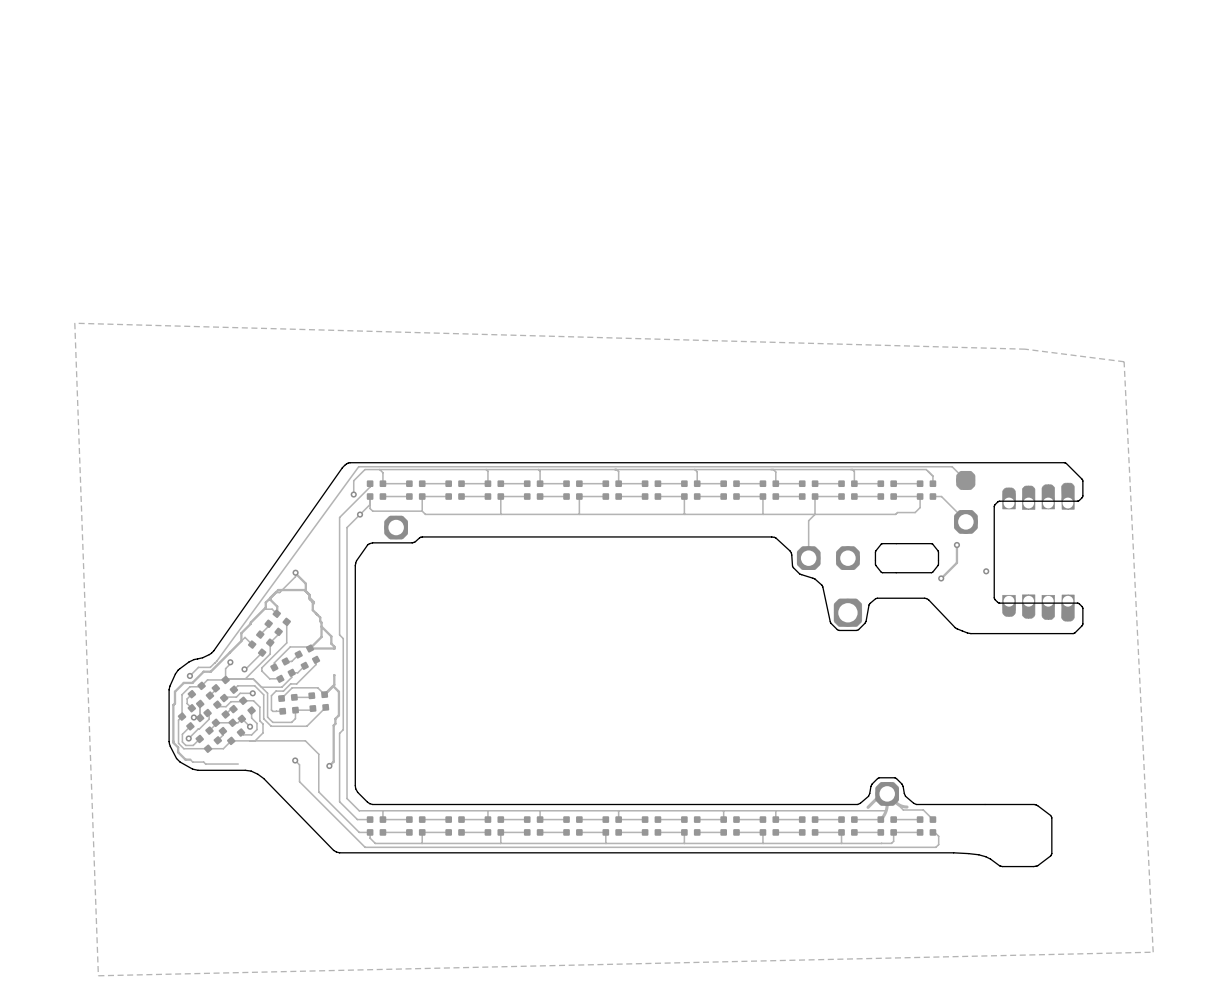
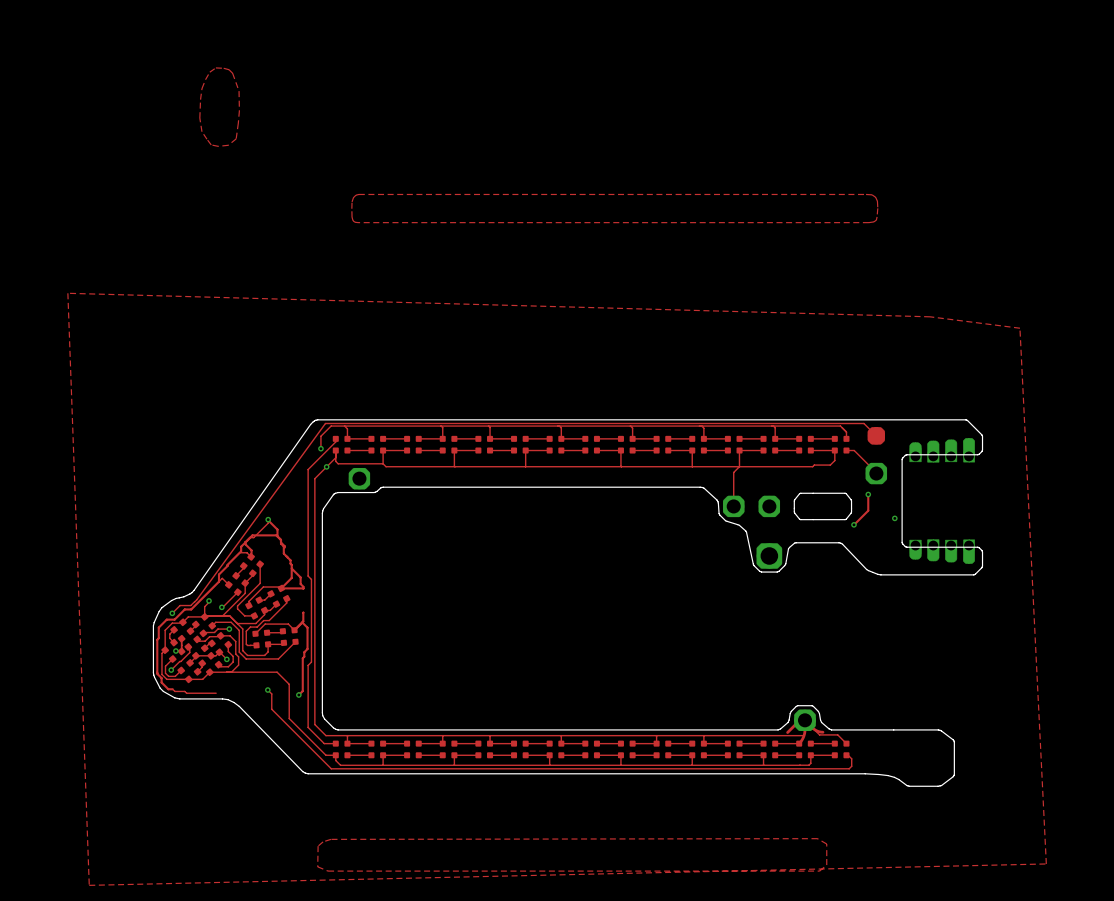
zone outline: none -> (215, 67) (209, 72) (201, 88) (199, 118) (201, 131) (211, 144) (218, 146) (228, 145) (236, 138) (239, 110) (239, 91) (232, 73) (229, 69) (215, 67)
zone outline: none -> (358, 194) (353, 197) (351, 208) (353, 220) (358, 222) (868, 222) (876, 220) (877, 208) (875, 197) (866, 194) (358, 194)
zone outline: none -> (817, 838) (826, 844) (826, 865) (819, 871) (328, 871) (317, 866) (318, 846) (330, 839) (817, 838)

